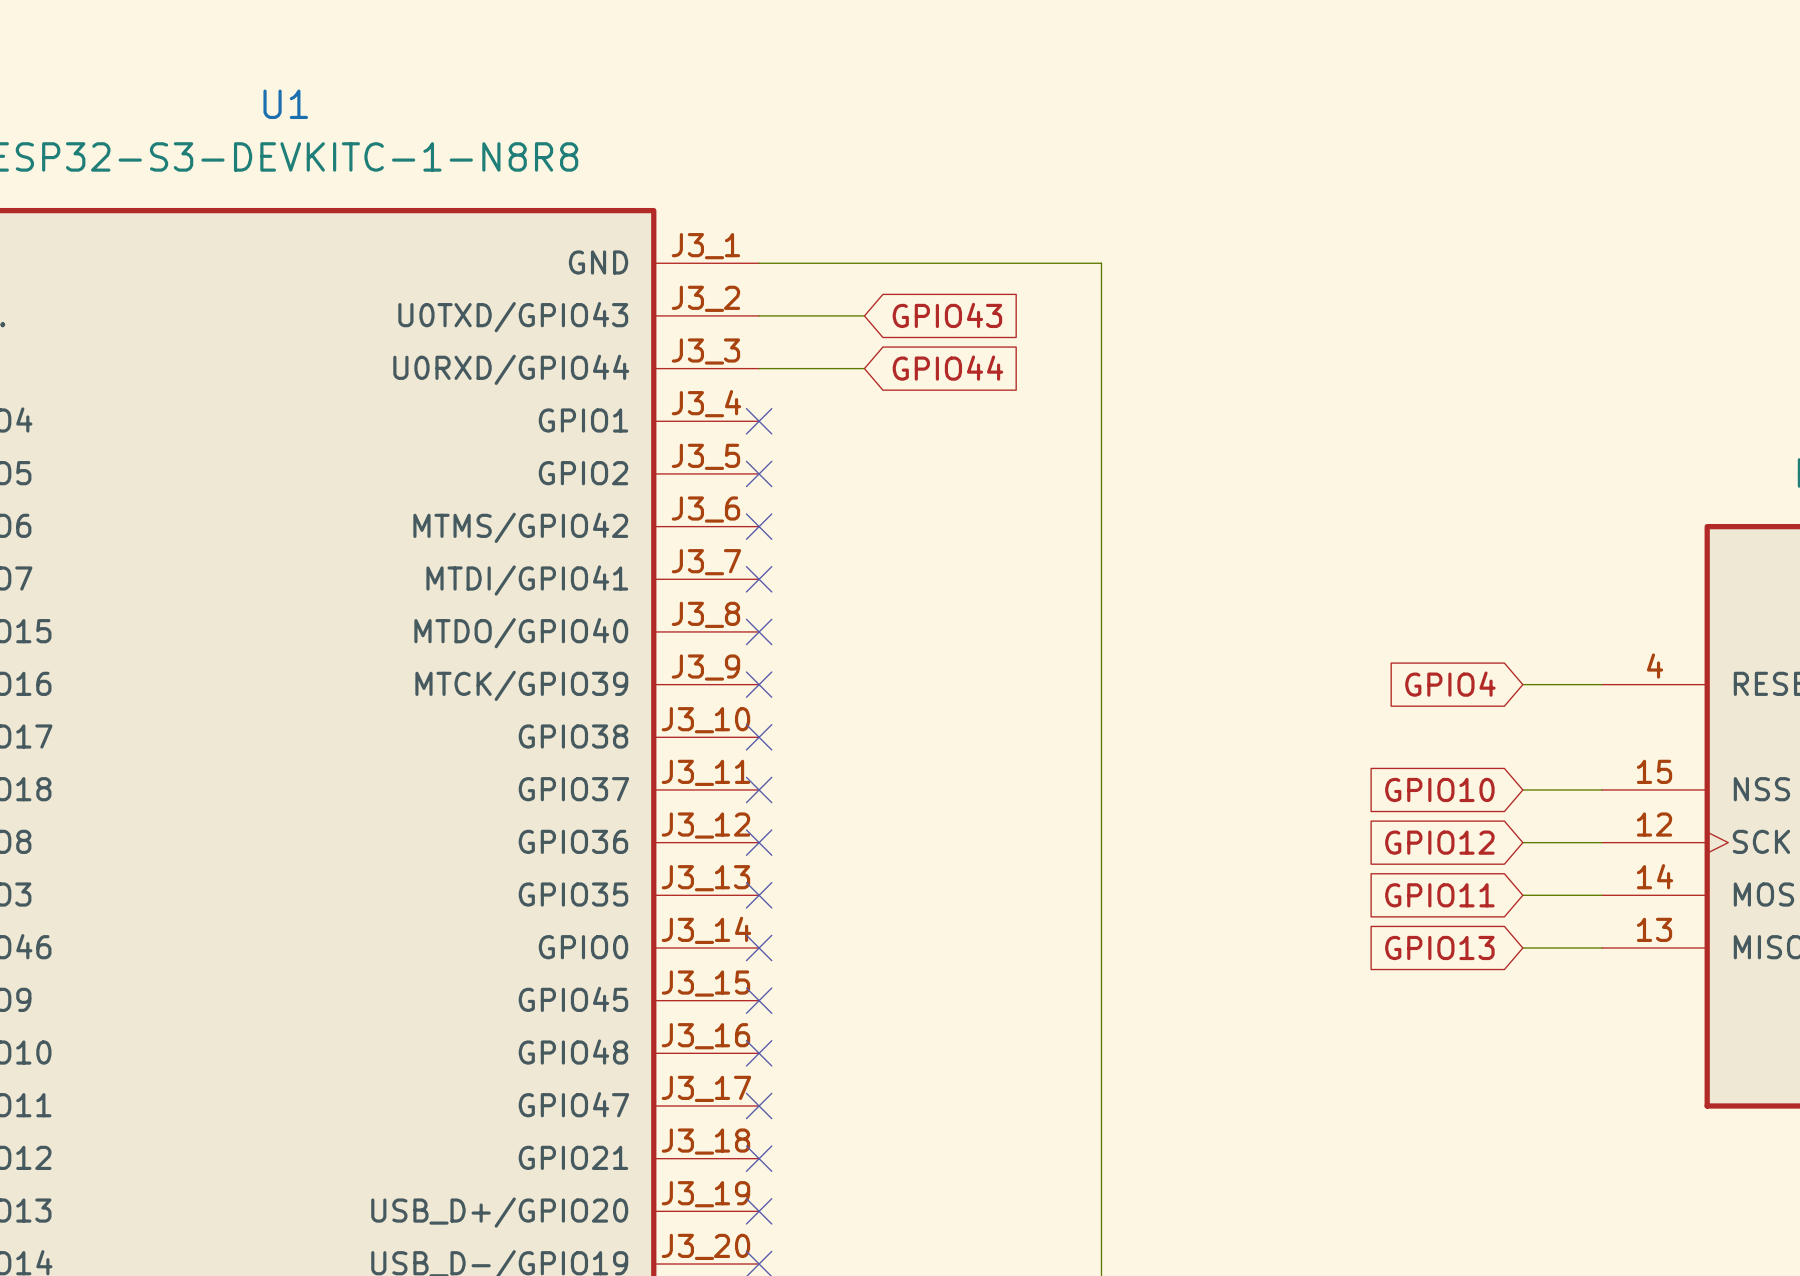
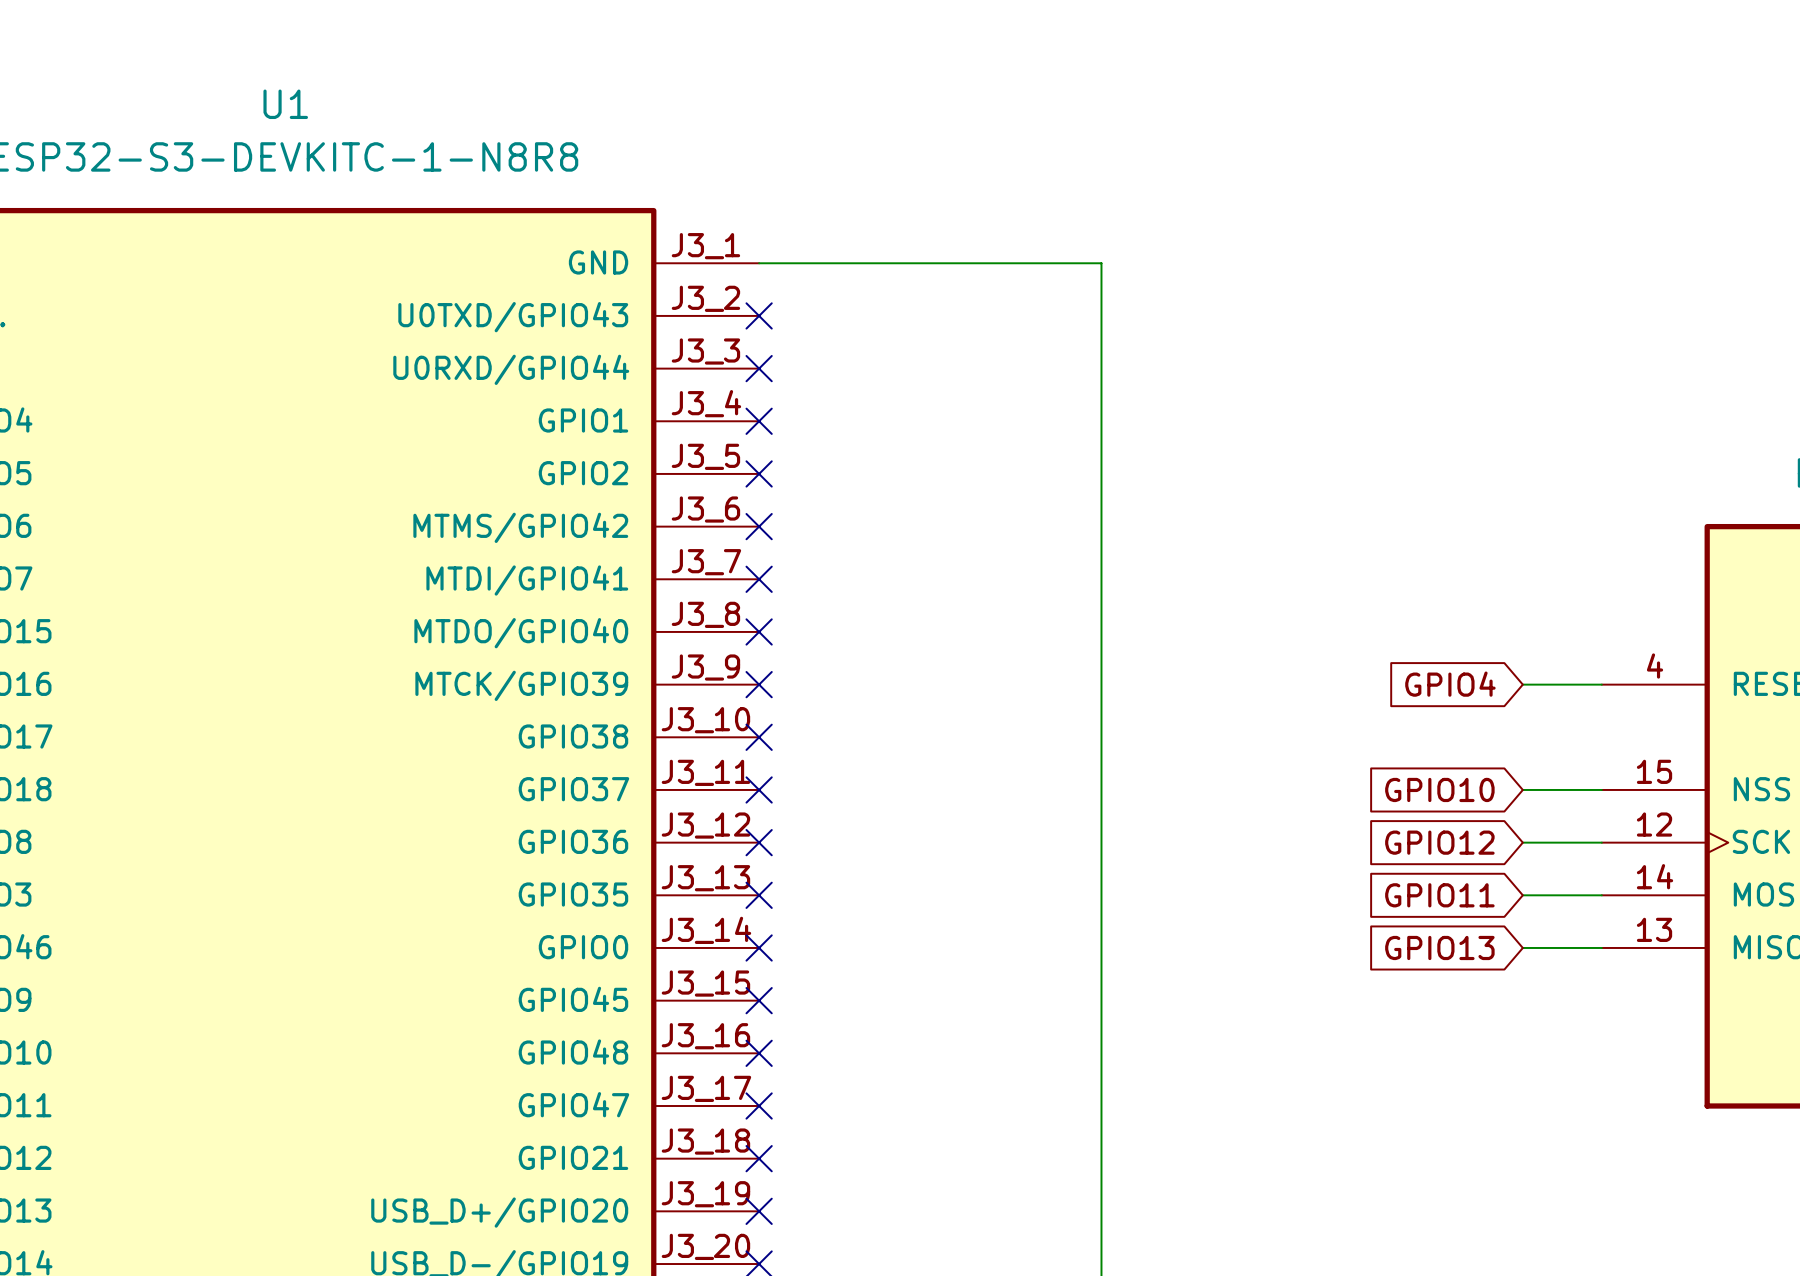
wire: (759, 315) (864, 315) -> none
no-connect mark: none -> (759, 315)
global label: GPIO43 (947, 315) -> none
wire: (759, 368) (864, 368) -> none
no-connect mark: none -> (759, 368)
global label: GPIO44 (947, 368) -> none

